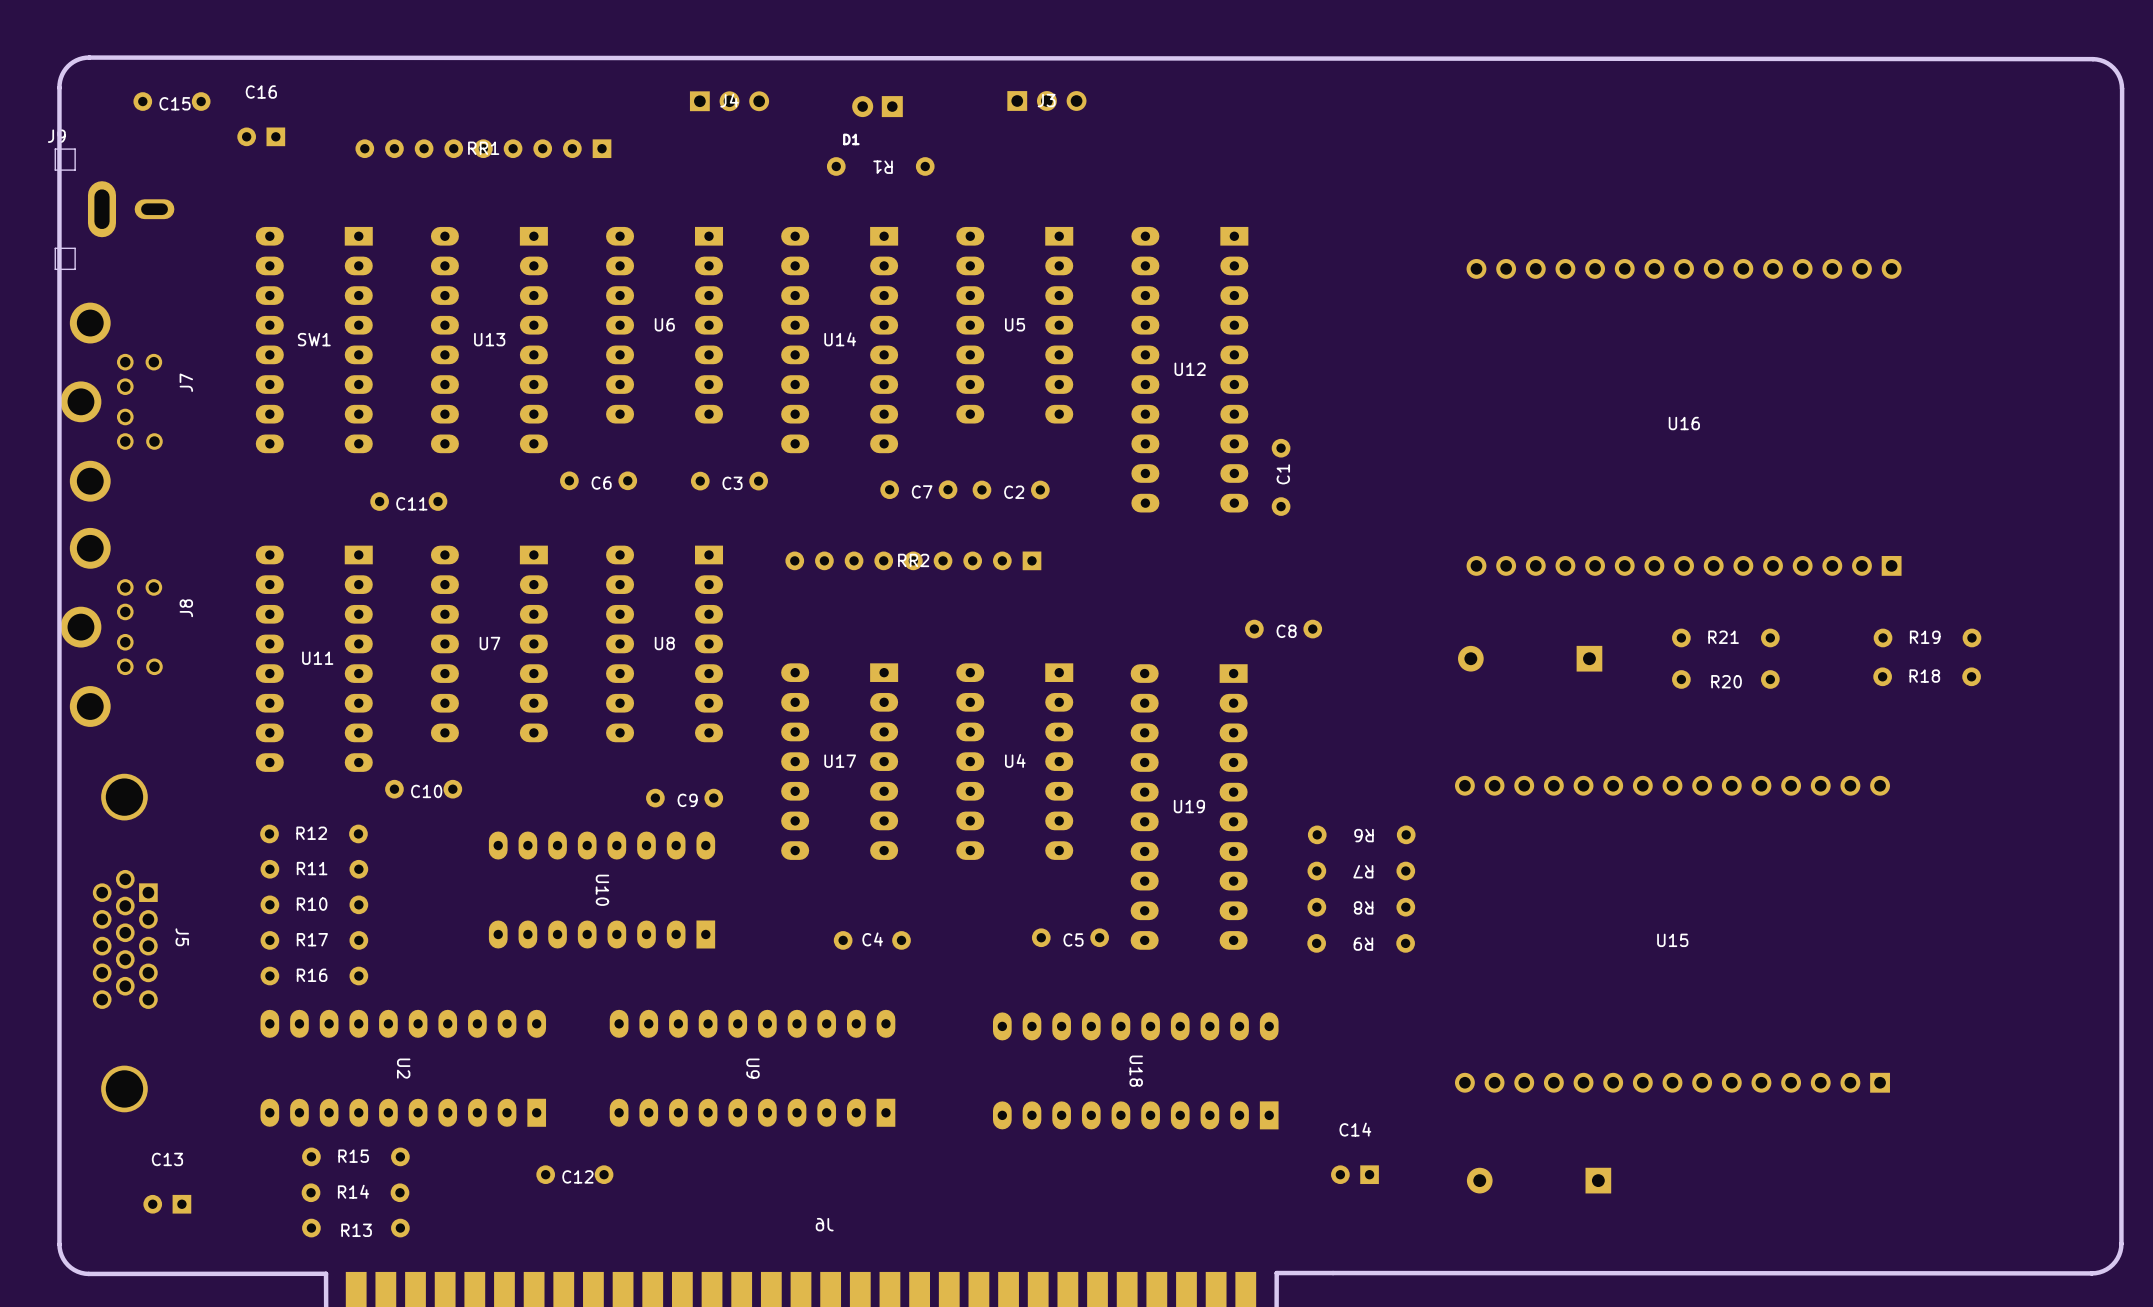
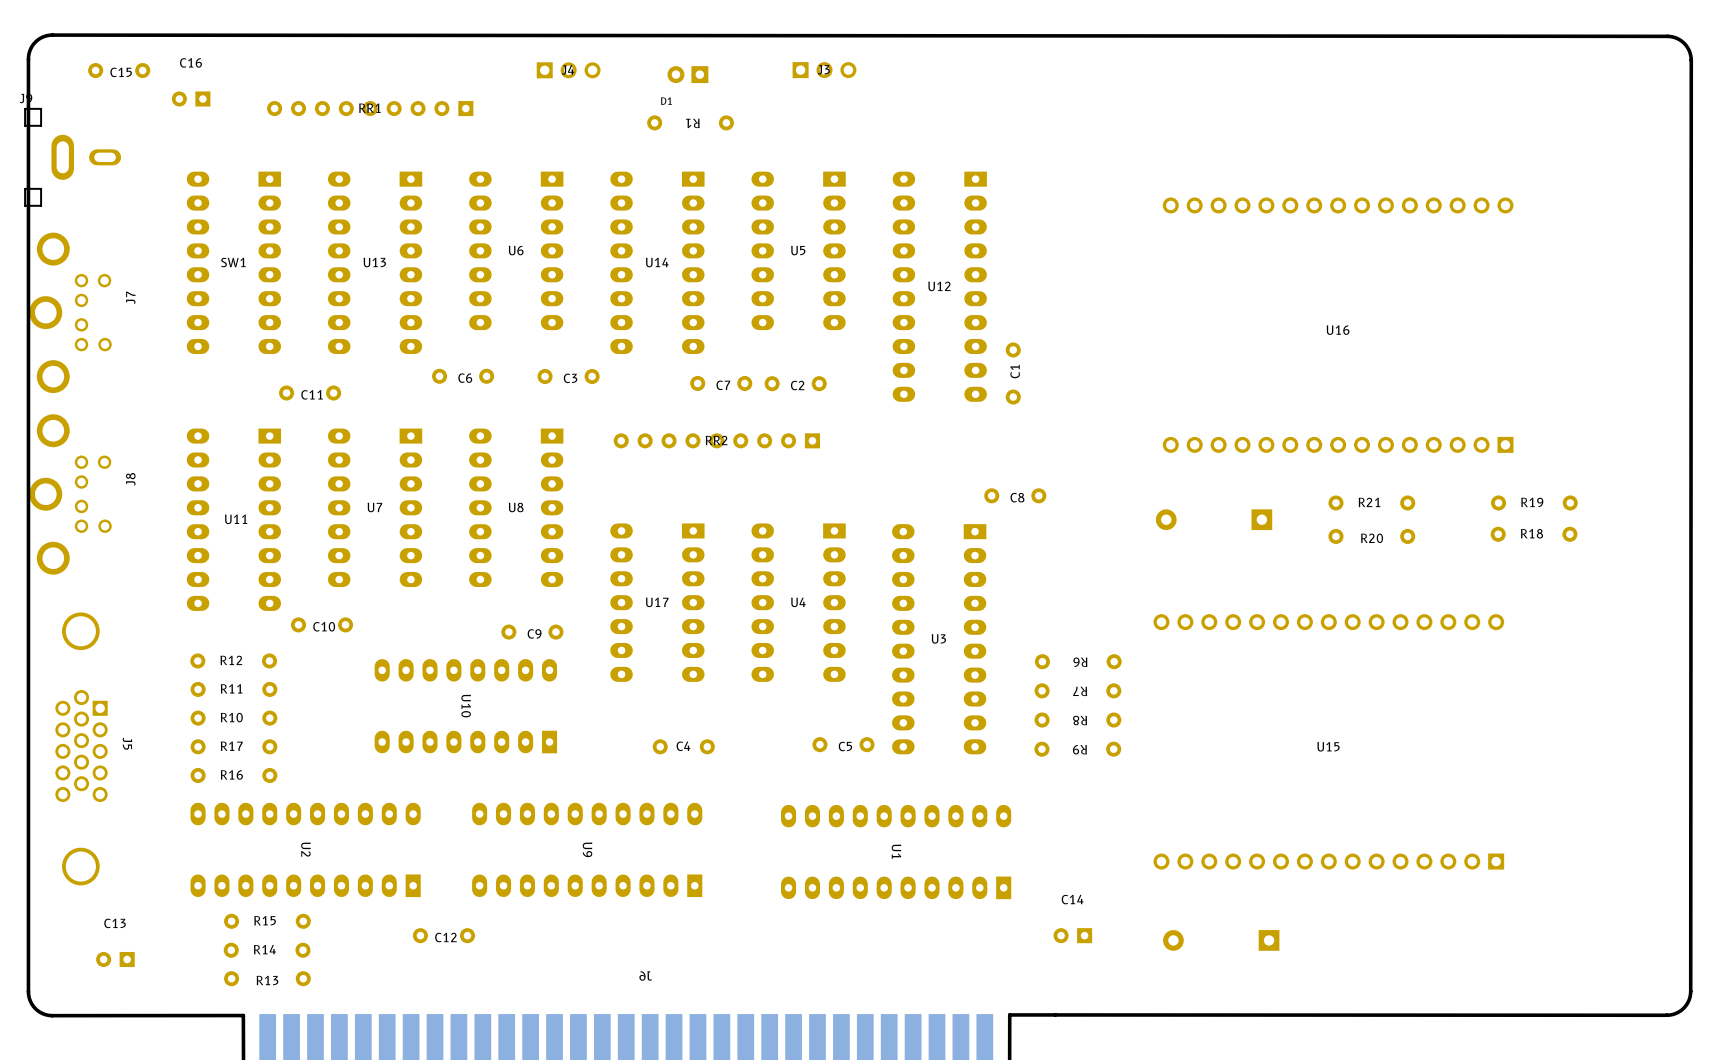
U19 name: U19 (1189, 806) -> U3 (938, 638)
U18 name: U18 (1136, 1071) -> U1 (896, 851)

